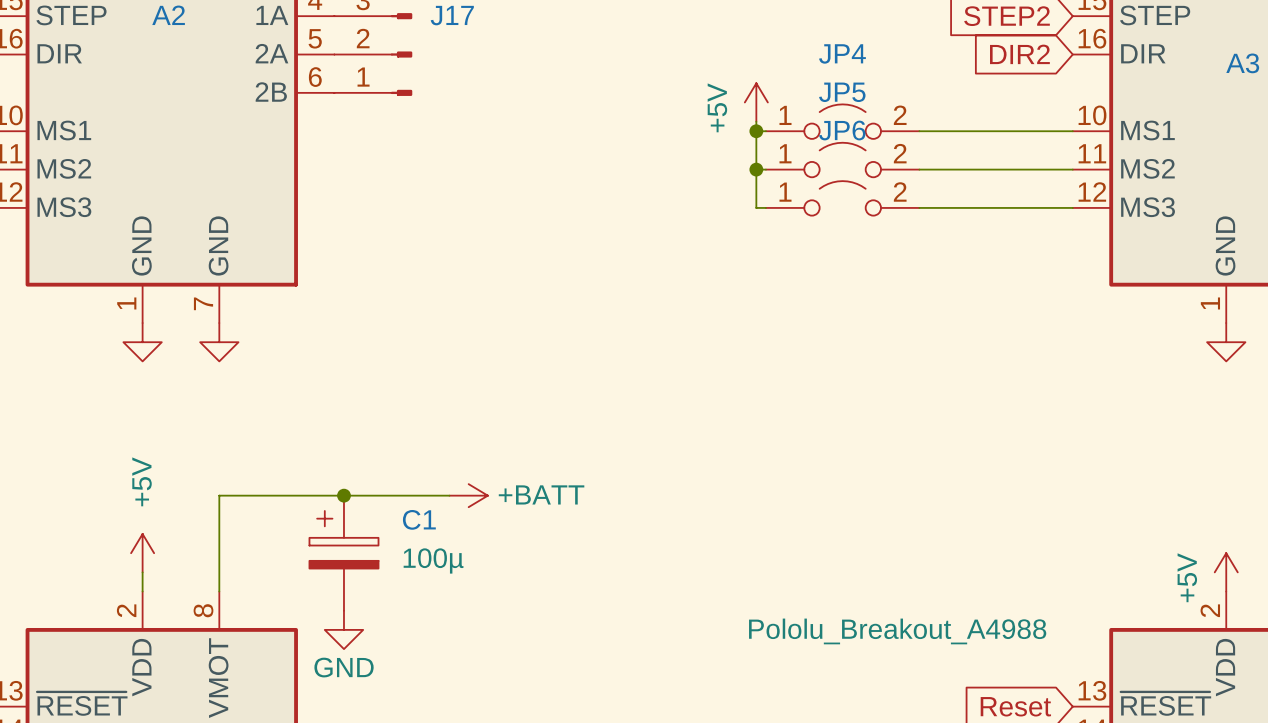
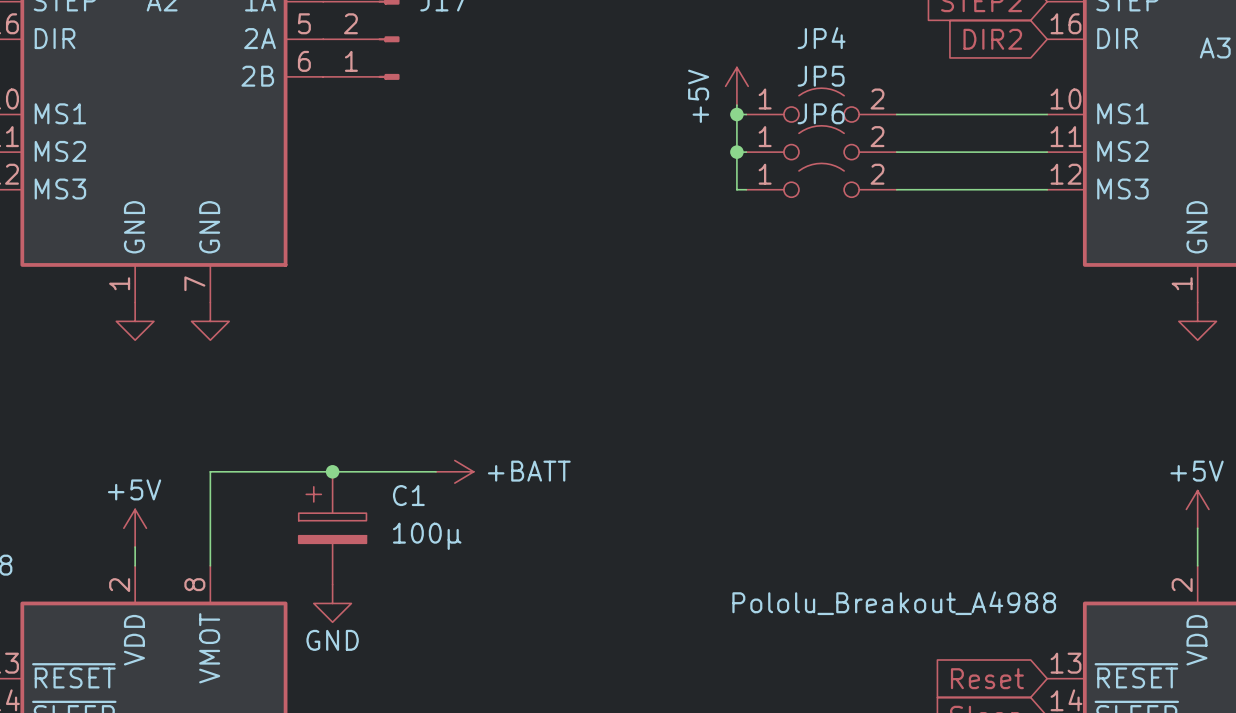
power symbol text rotation: 0° (142, 481) -> 90° clockwise (134, 489)
power symbol position: +5V (1226, 572) -> +5V (1197, 509)
power symbol text rotation: 0° (1187, 577) -> 90° clockwise (1197, 471)

